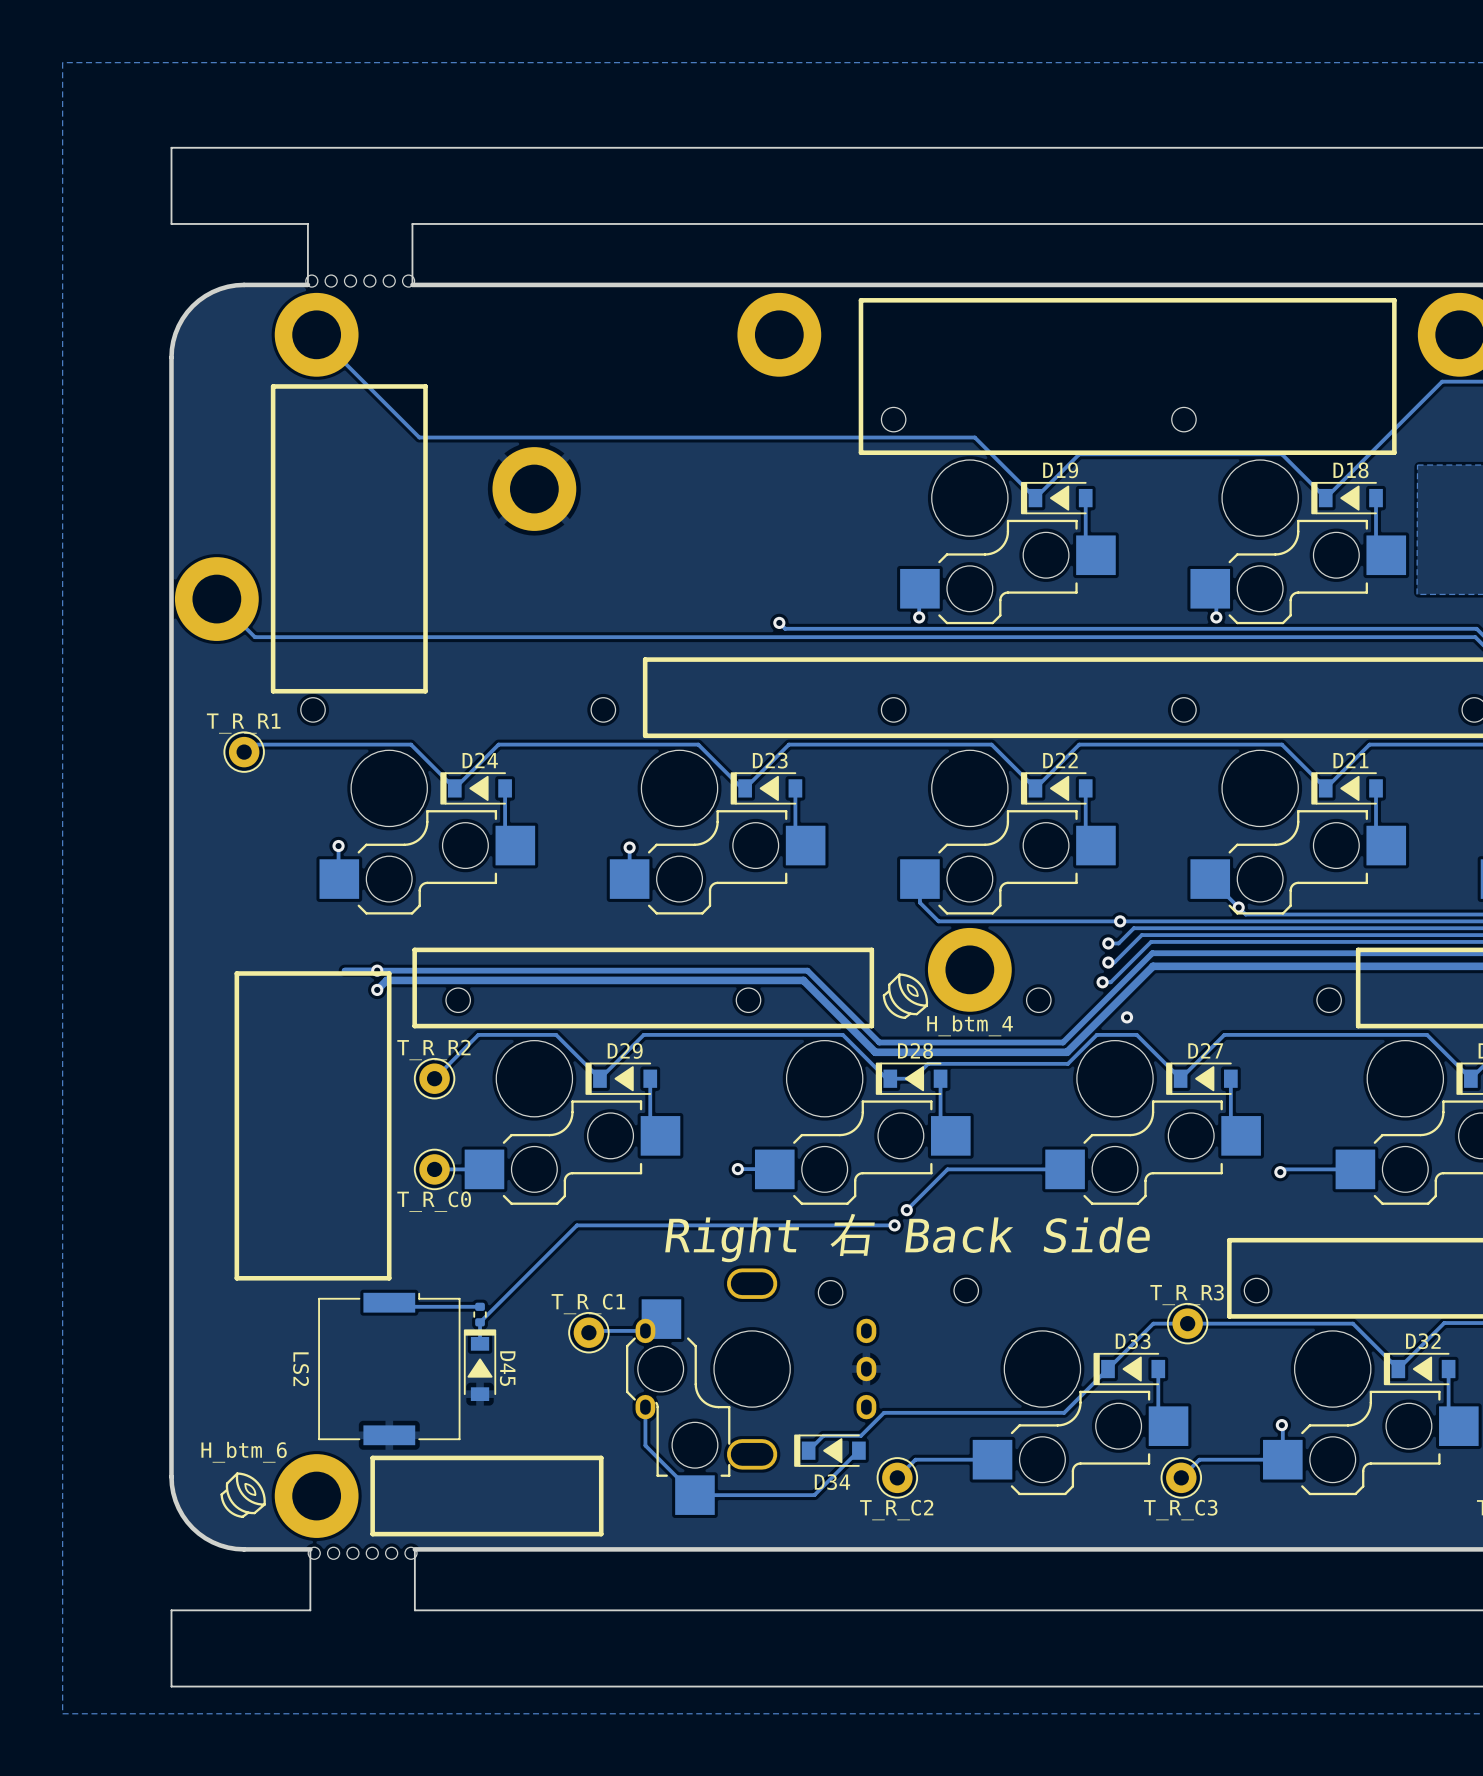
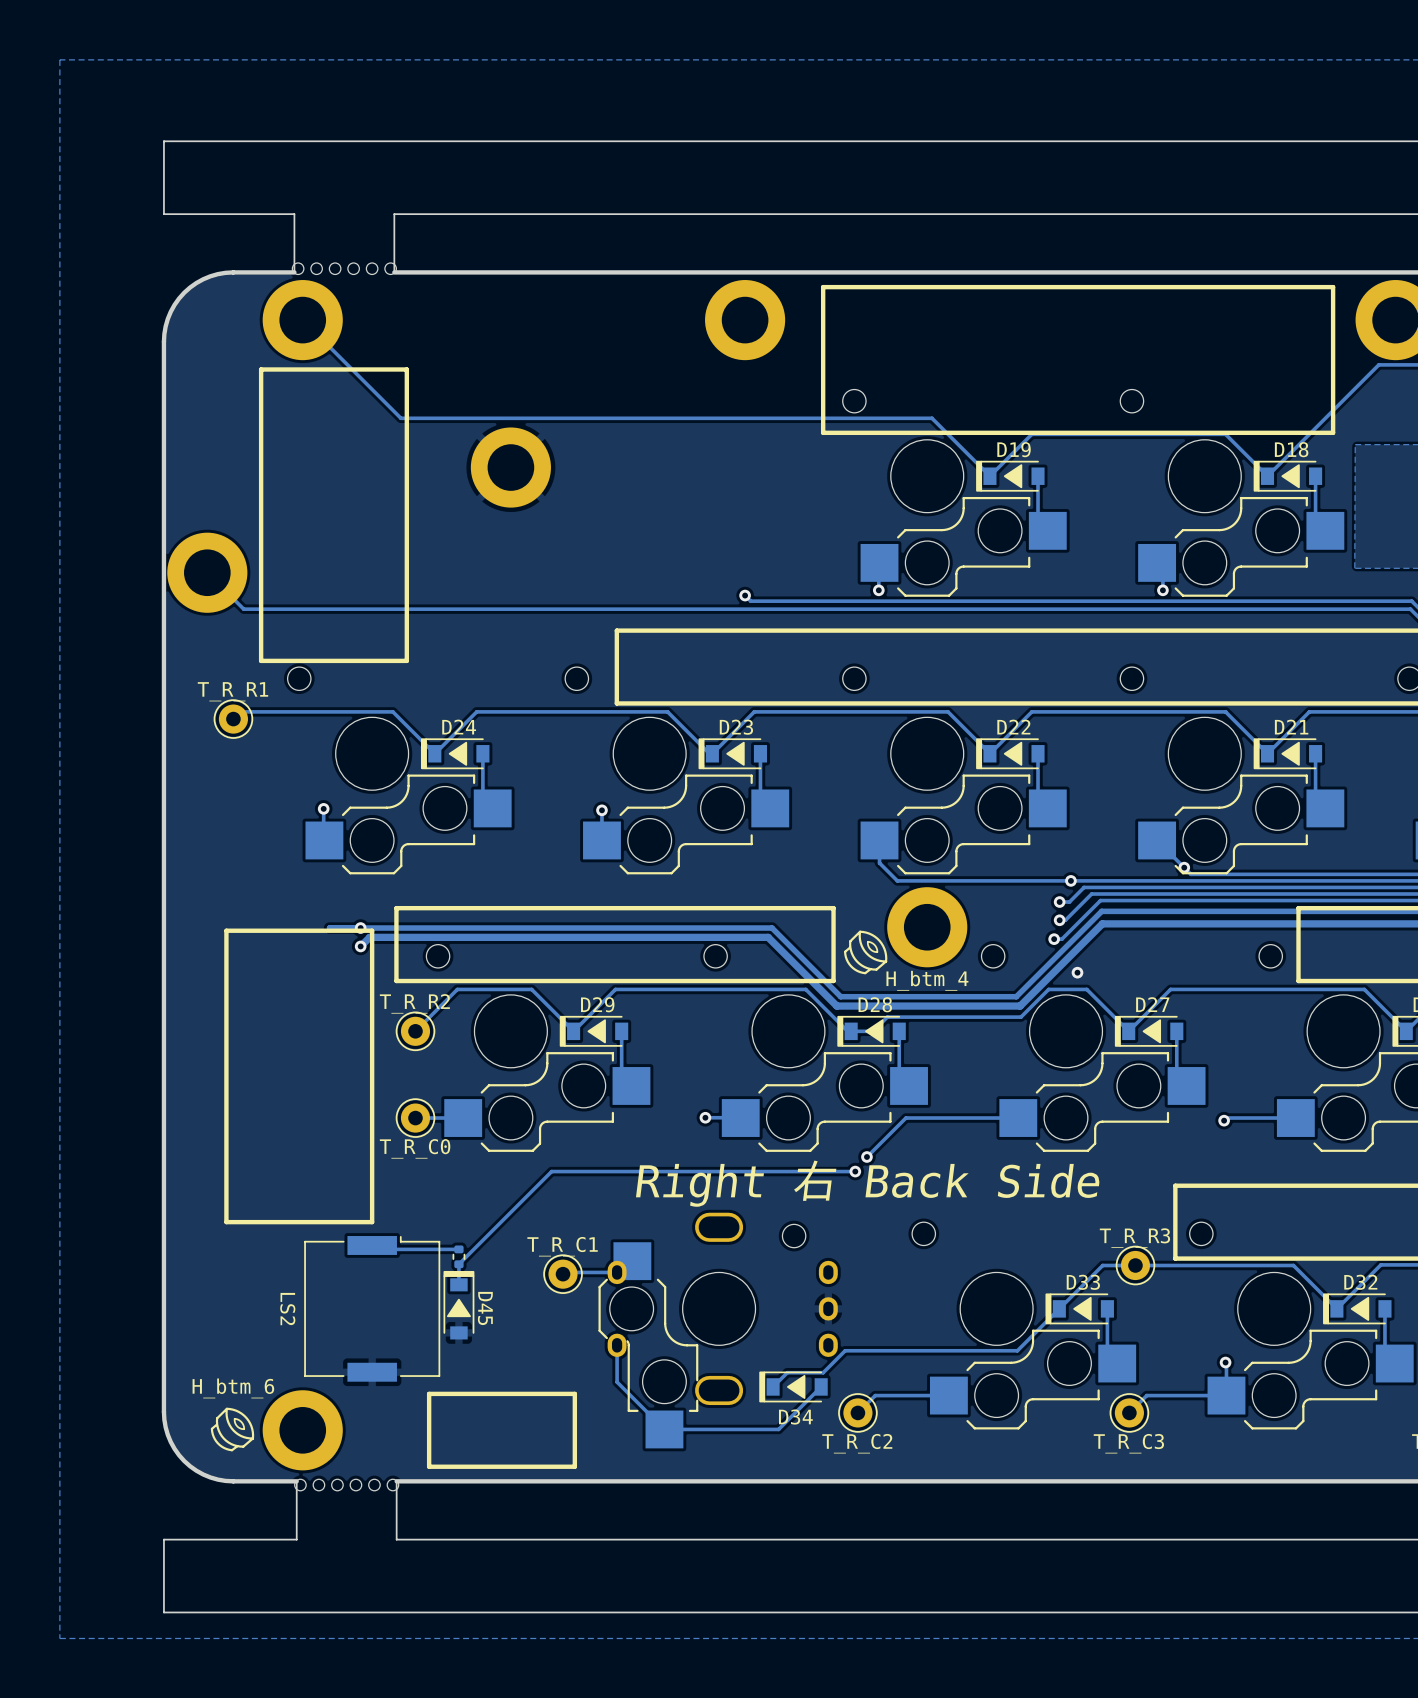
line: (448, 1457) (372, 1457) (372, 1534) (448, 1534) -> (429, 1393) (429, 1466)

